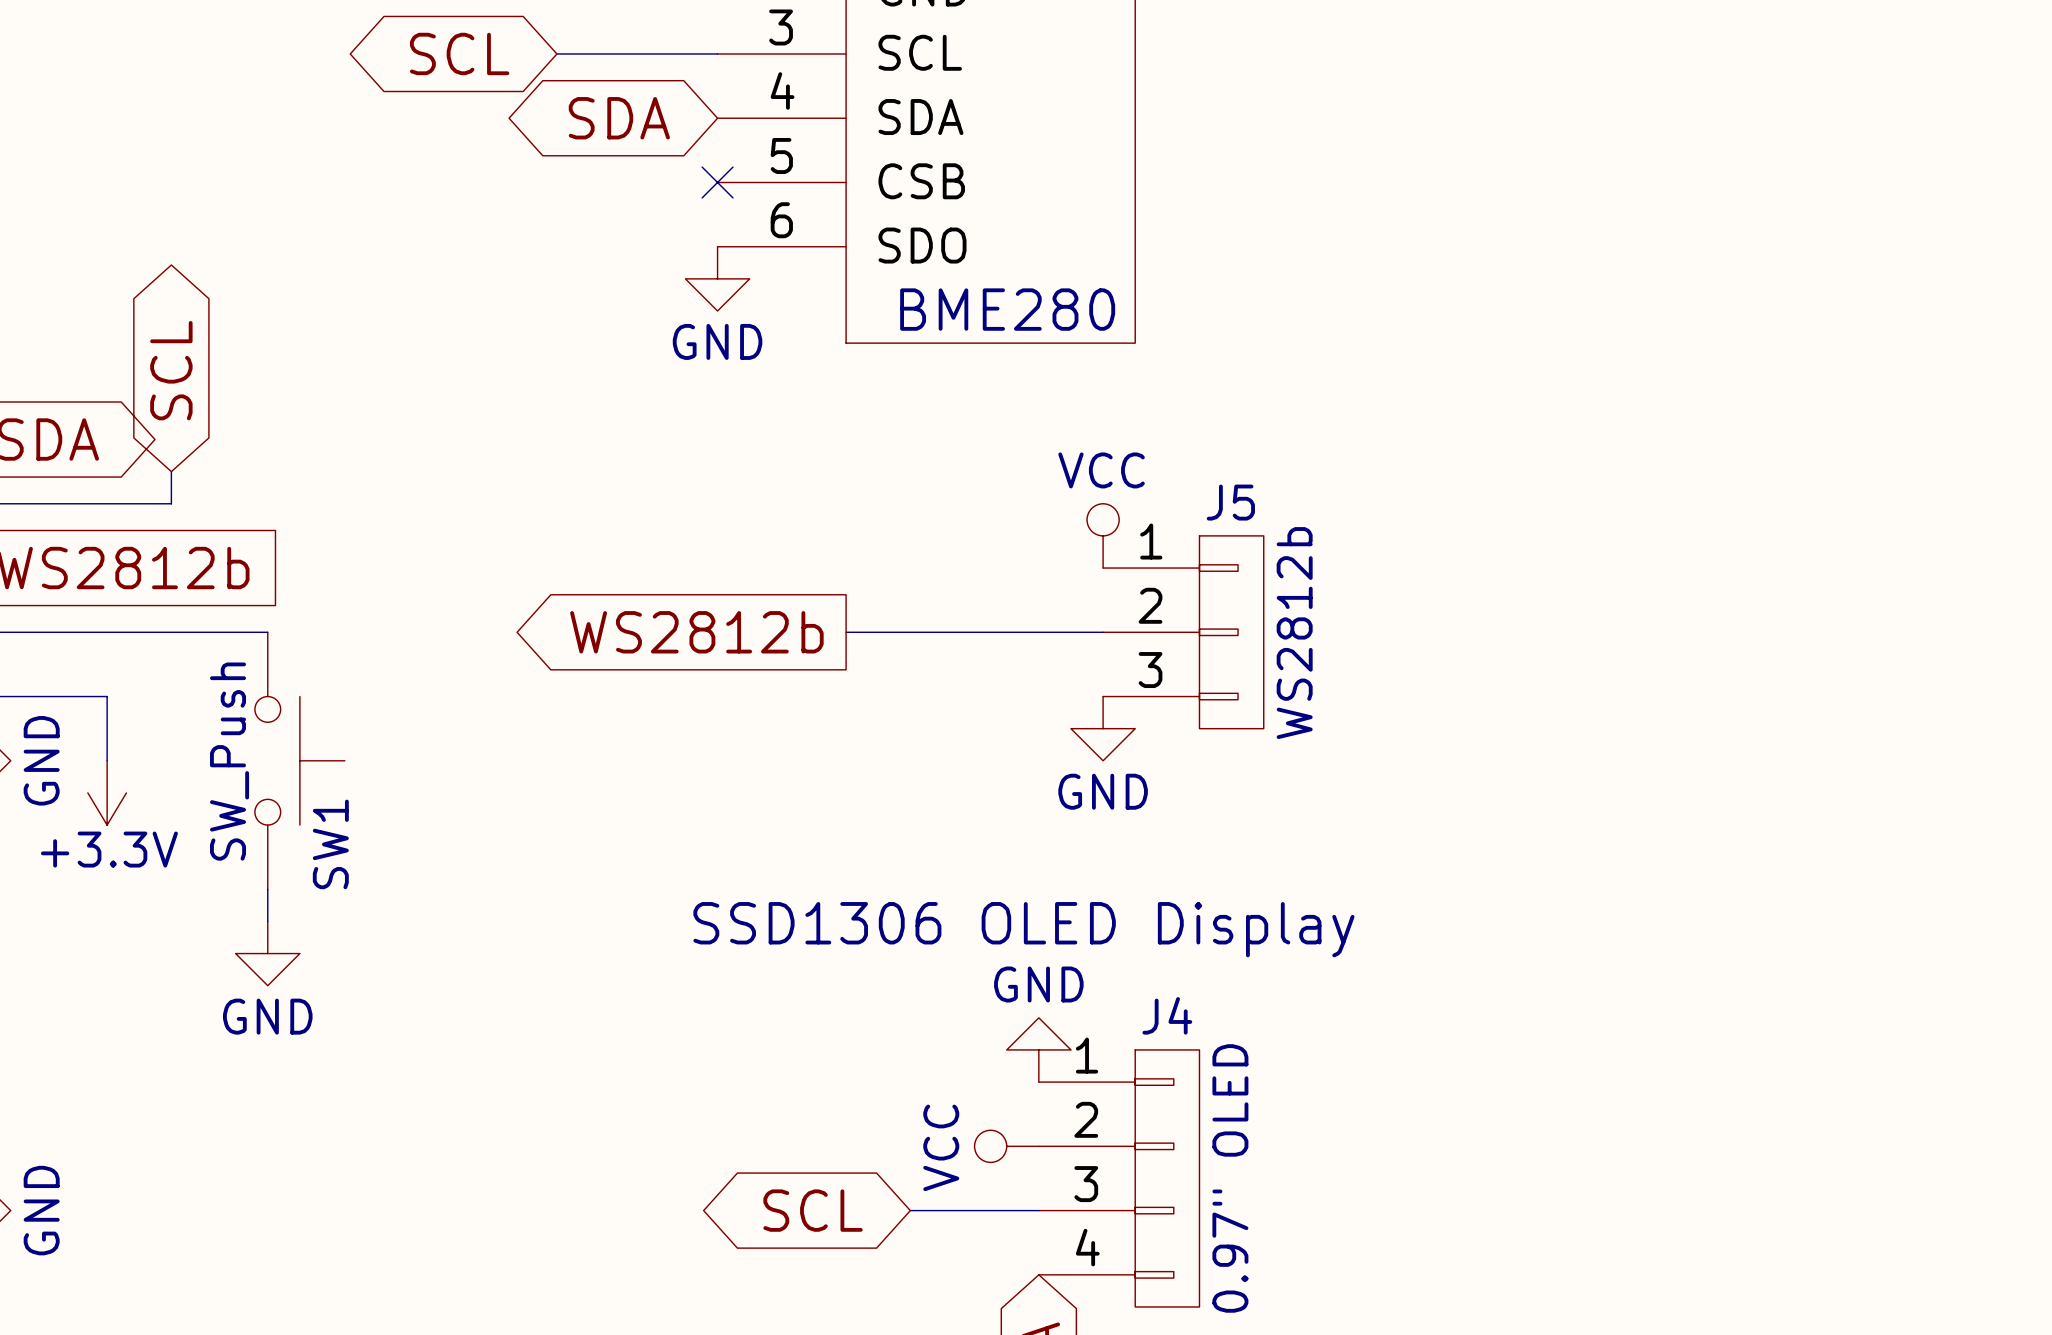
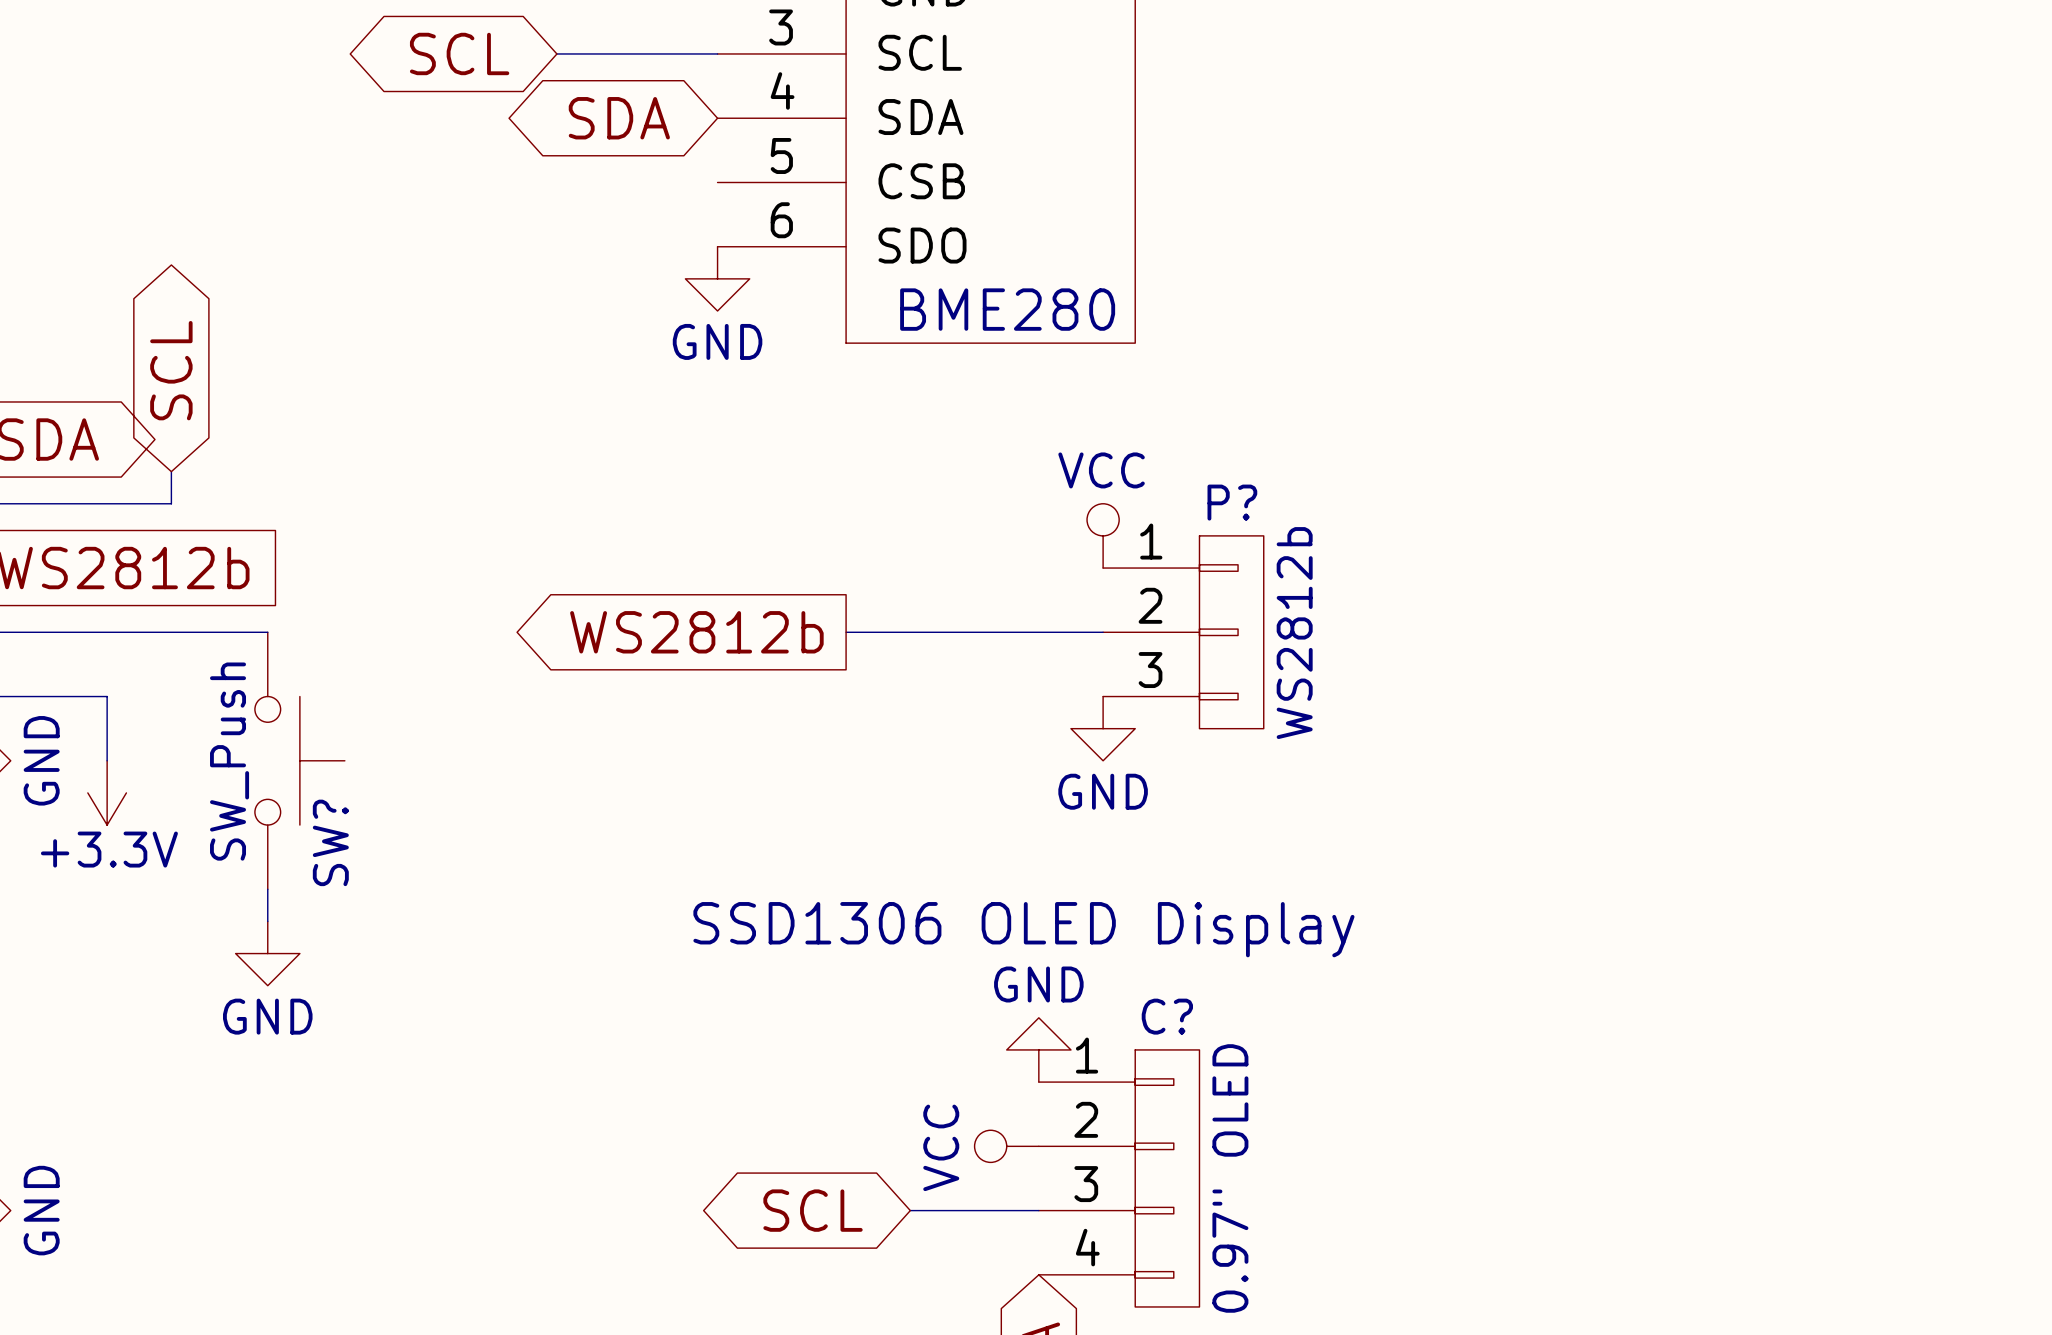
no-connect mark: (717, 182) -> none
J5 name: J5 (1230, 502) -> P? (1232, 502)
SW1 name: SW1 (330, 844) -> SW? (330, 842)
J4 name: J4 (1167, 1015) -> C? (1167, 1016)

